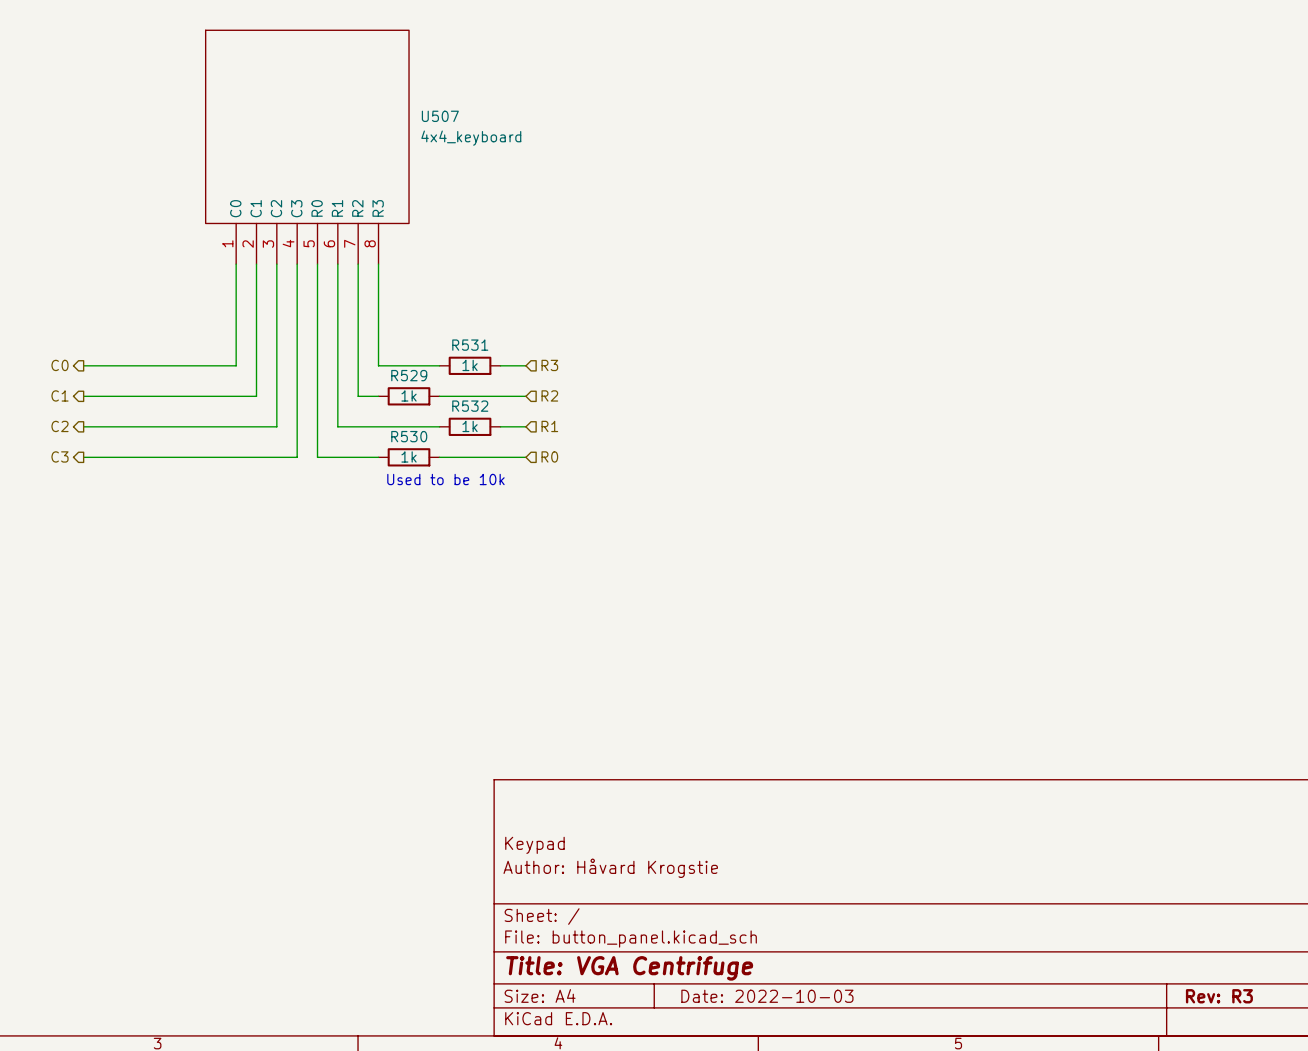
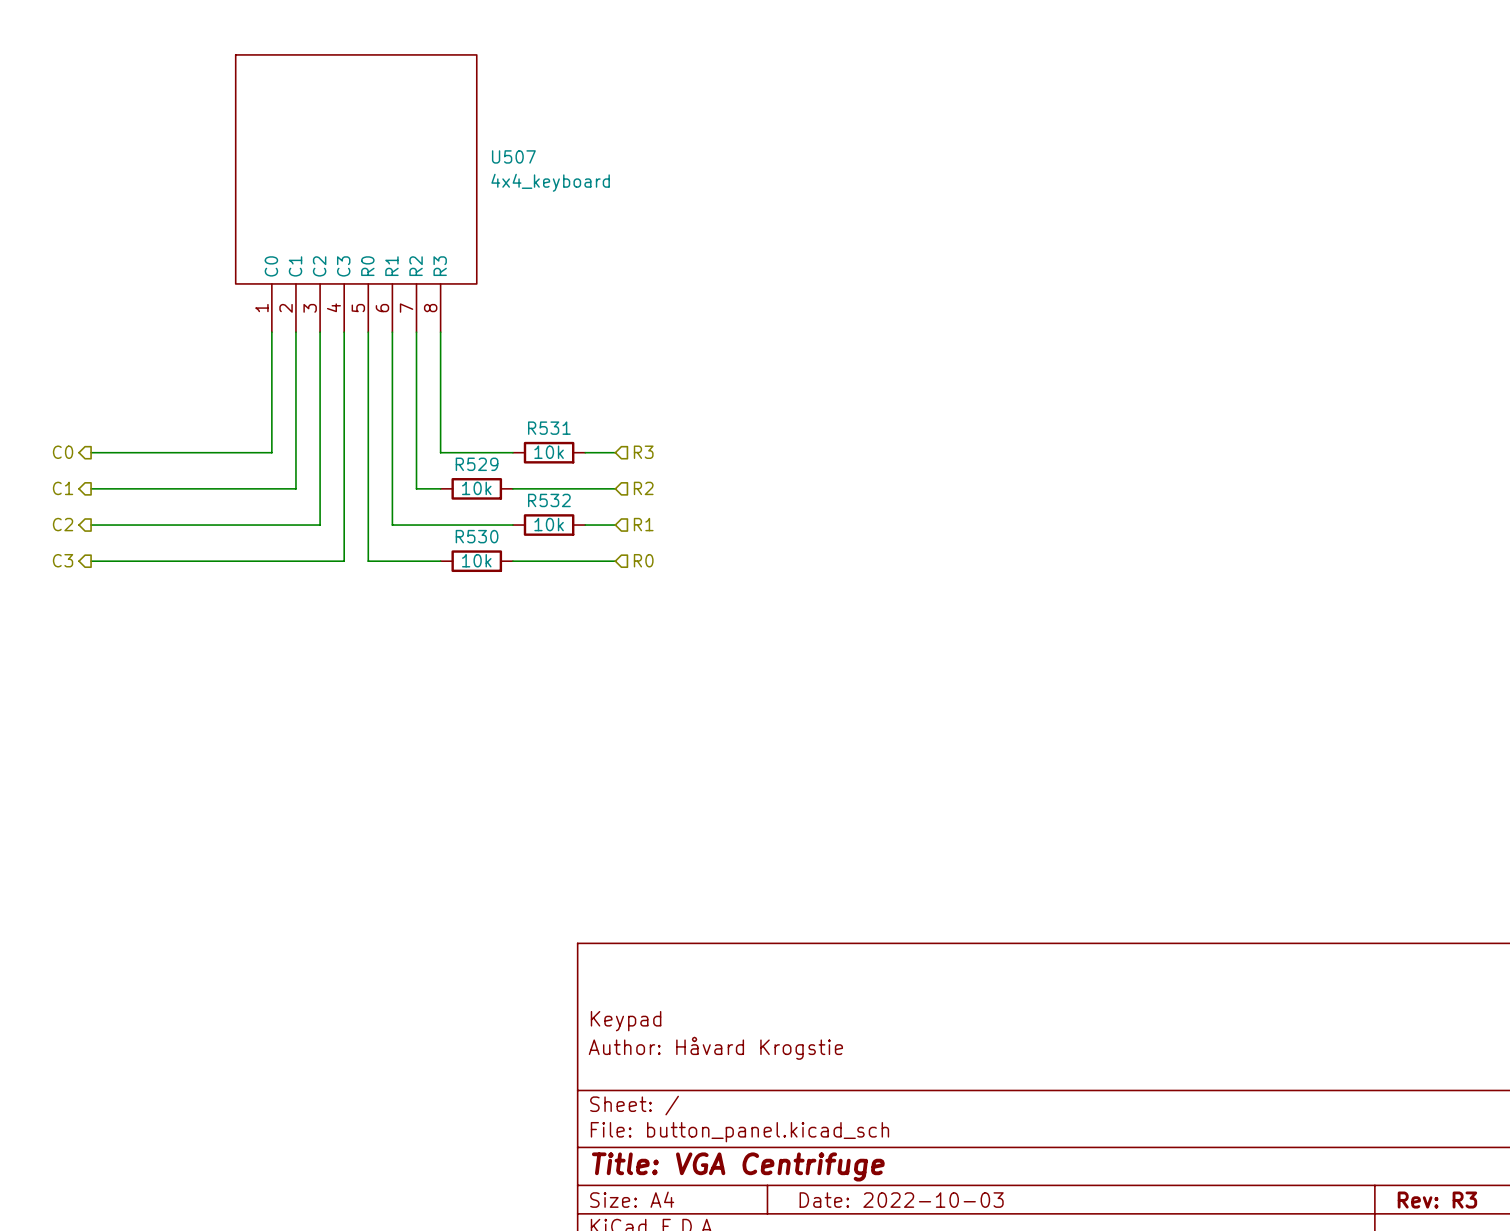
R531 value: 1k (470, 365) -> 10k (549, 452)
R529 value: 1k (409, 395) -> 10k (476, 488)
R532 value: 1k (470, 426) -> 10k (549, 524)
R530 value: 1k (409, 456) -> 10k (476, 560)
text: Used to be 10k (445, 479) -> none

